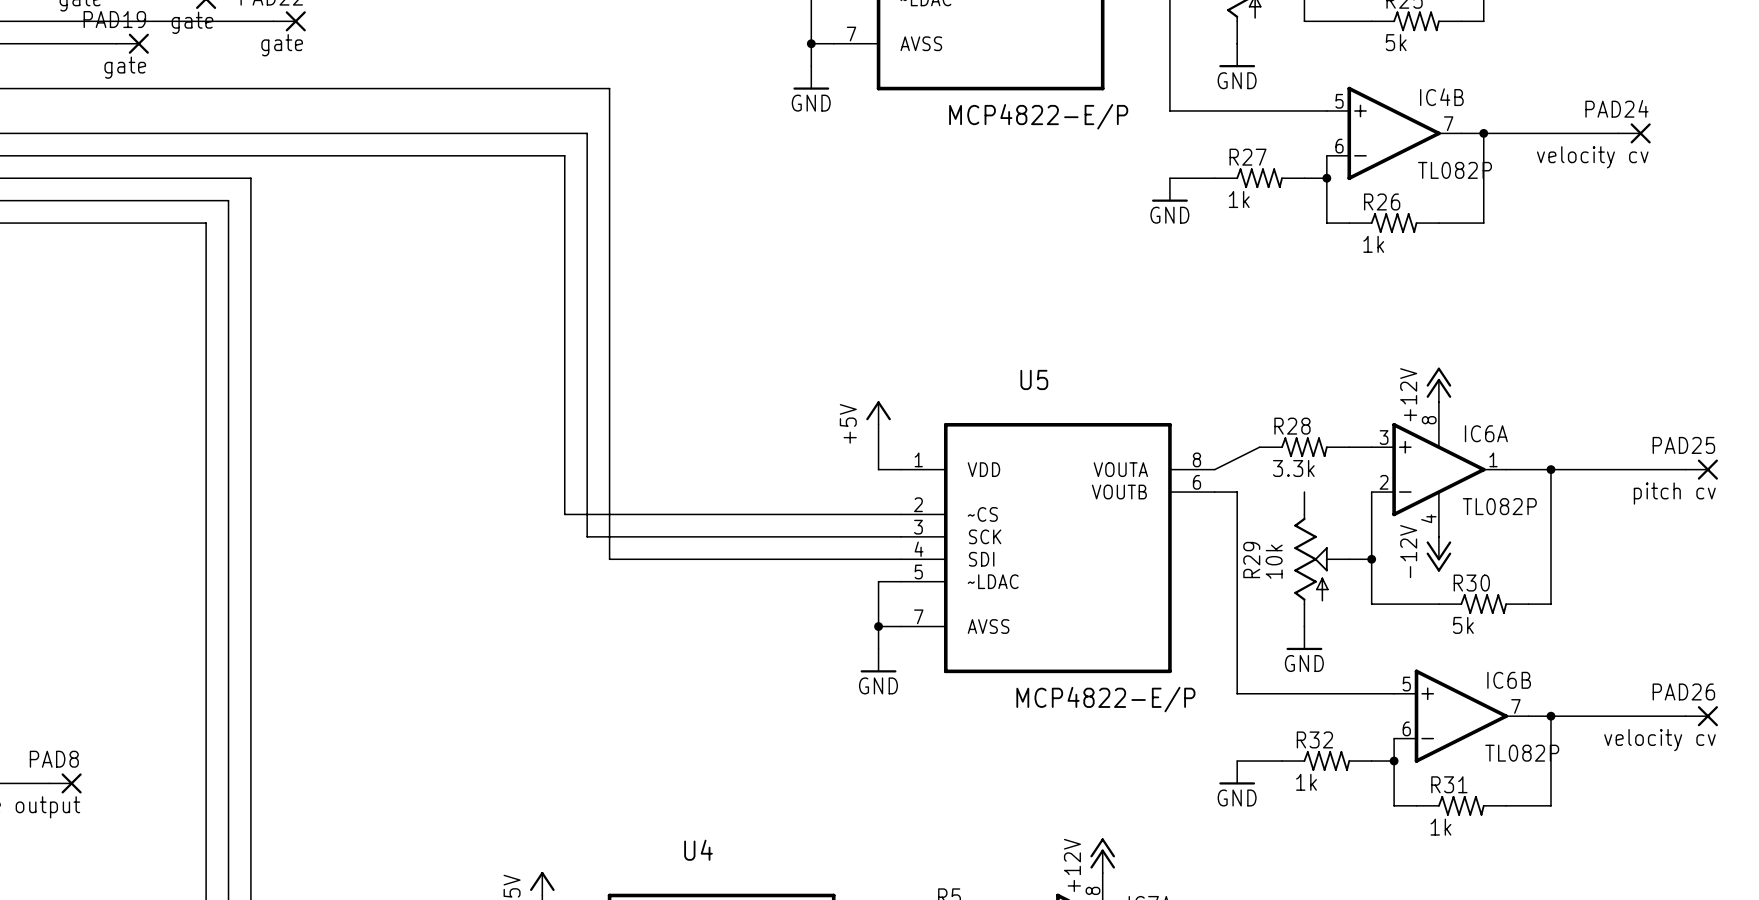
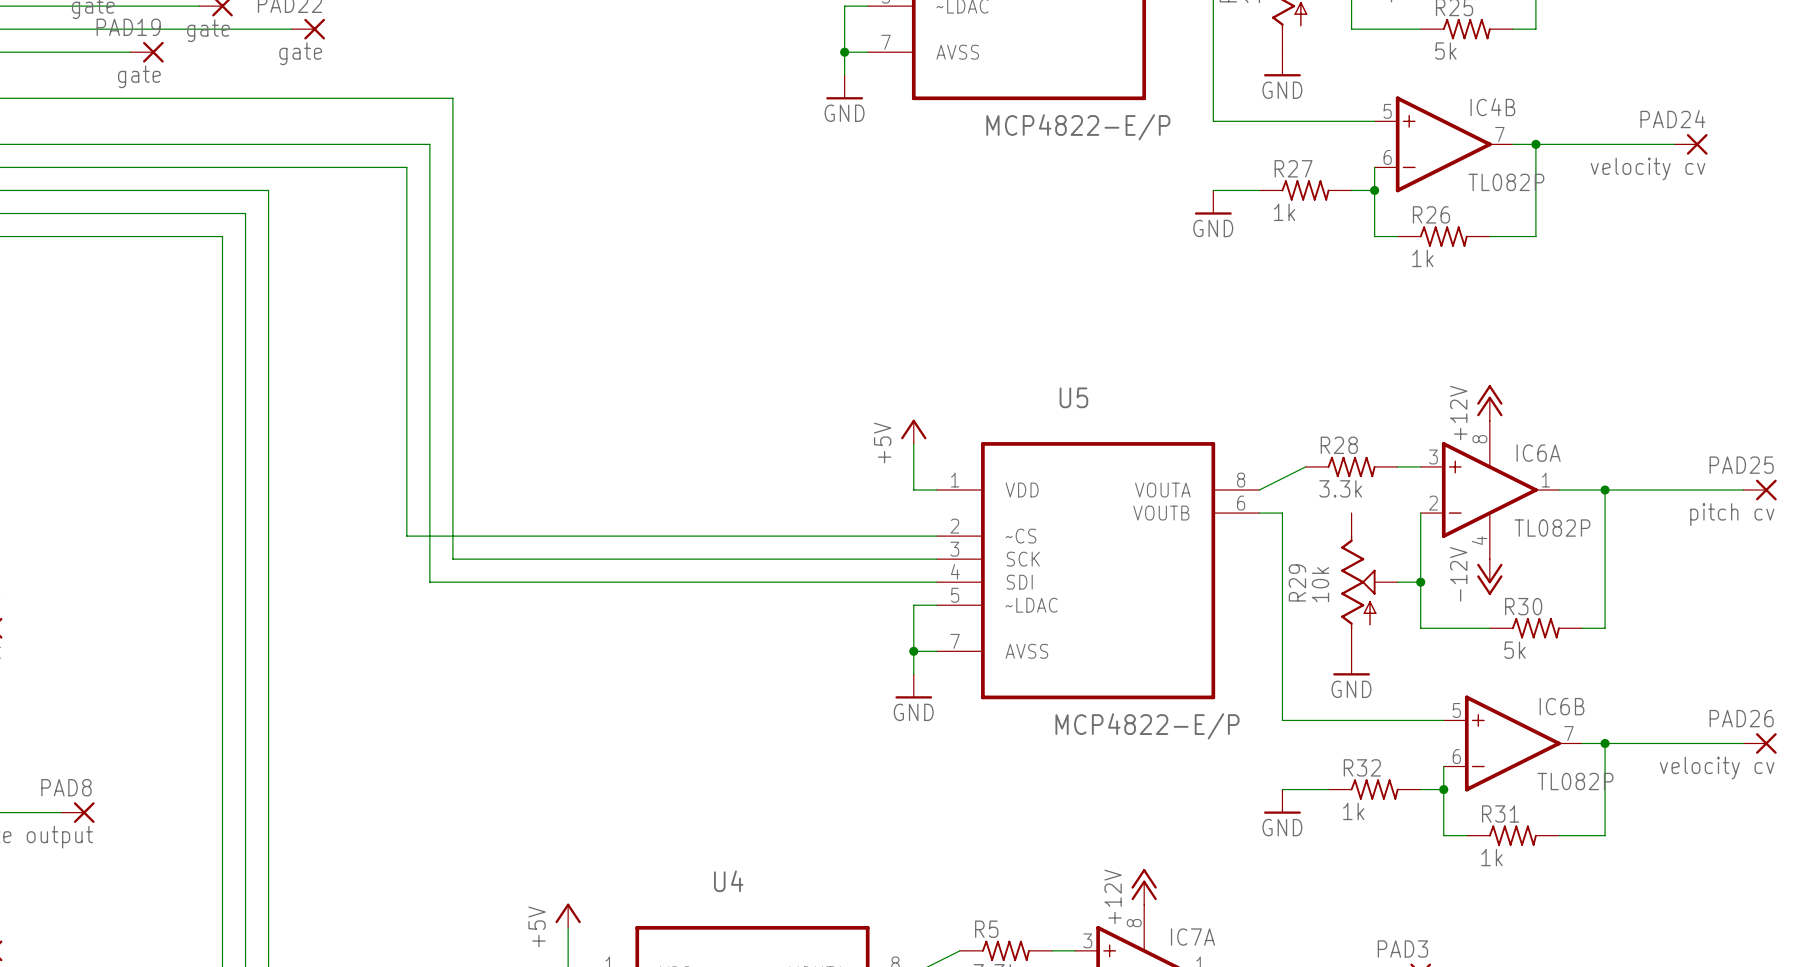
wire: (430, 88) (609, 88) (609, 559) -> (452, 98) (452, 559) (614, 559)
wire: (407, 133) (587, 133) (587, 536) -> (429, 144) (429, 582) (637, 582)
wire: (385, 155) (564, 155) (564, 514) -> (406, 167) (406, 536) (591, 536)

